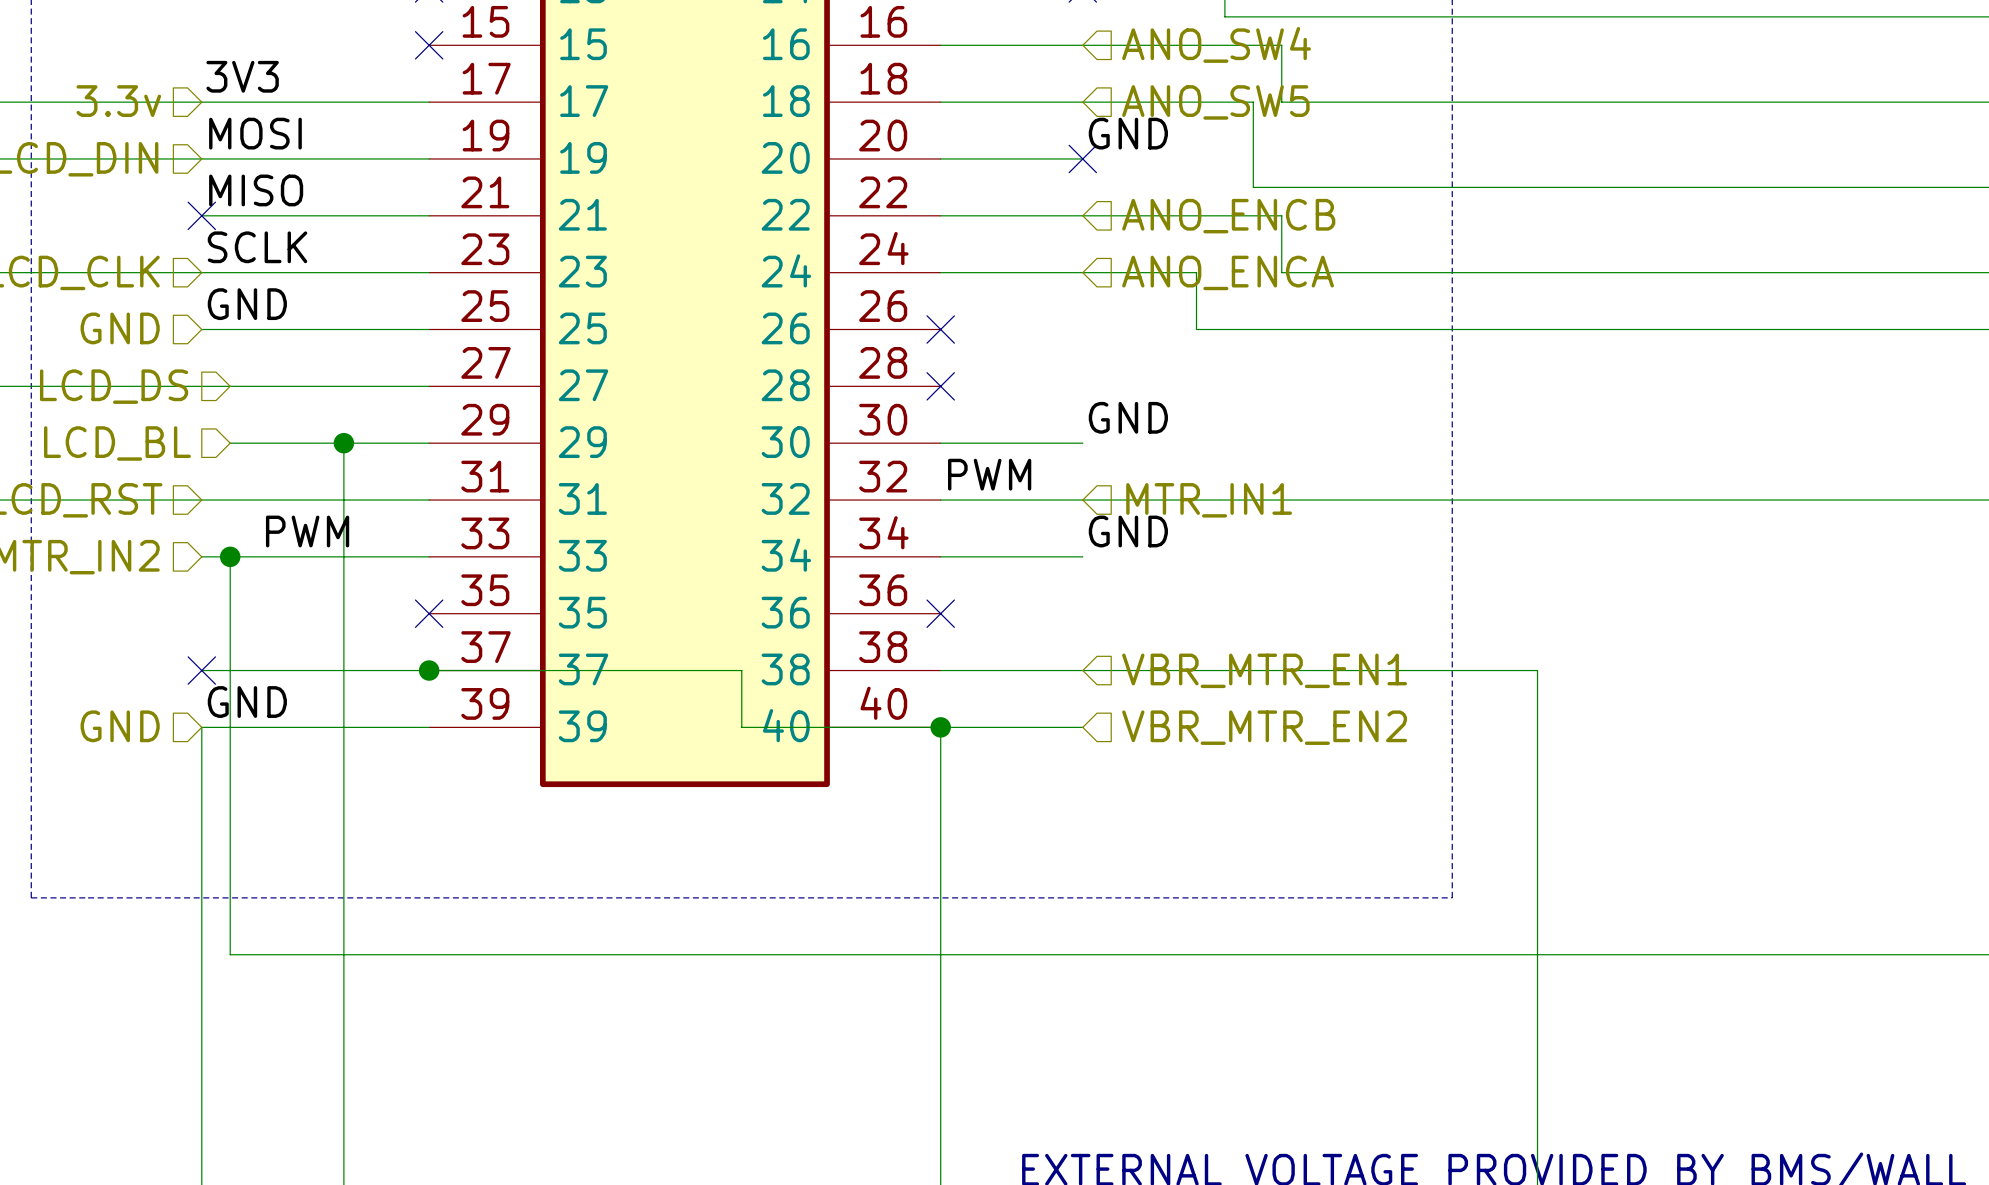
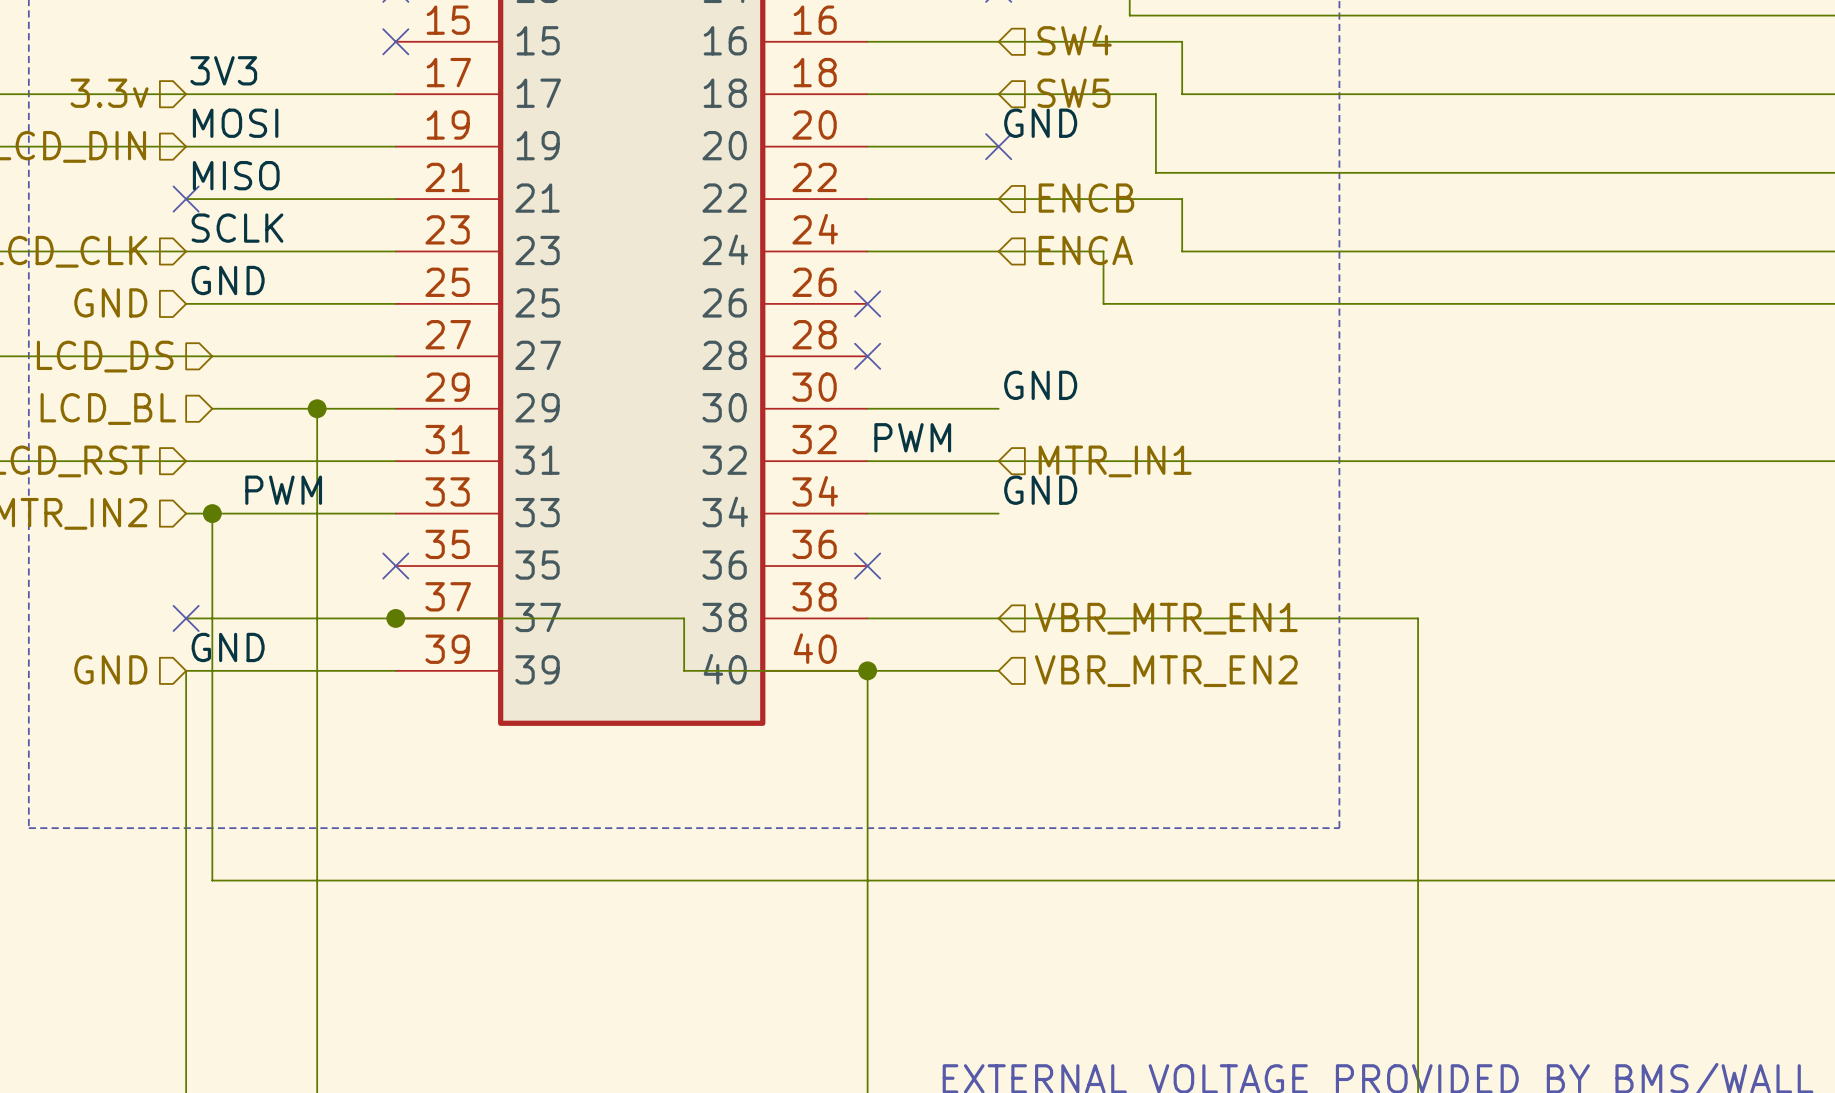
hierarchical label: ANO_SW4 (1216, 44) -> SW4 (1074, 40)
hierarchical label: ANO_SW5 (1215, 102) -> SW5 (1073, 93)
hierarchical label: ANO_ENCB (1228, 216) -> ENCB (1086, 198)
hierarchical label: ANO_ENCA (1228, 272) -> ENCA (1085, 250)

